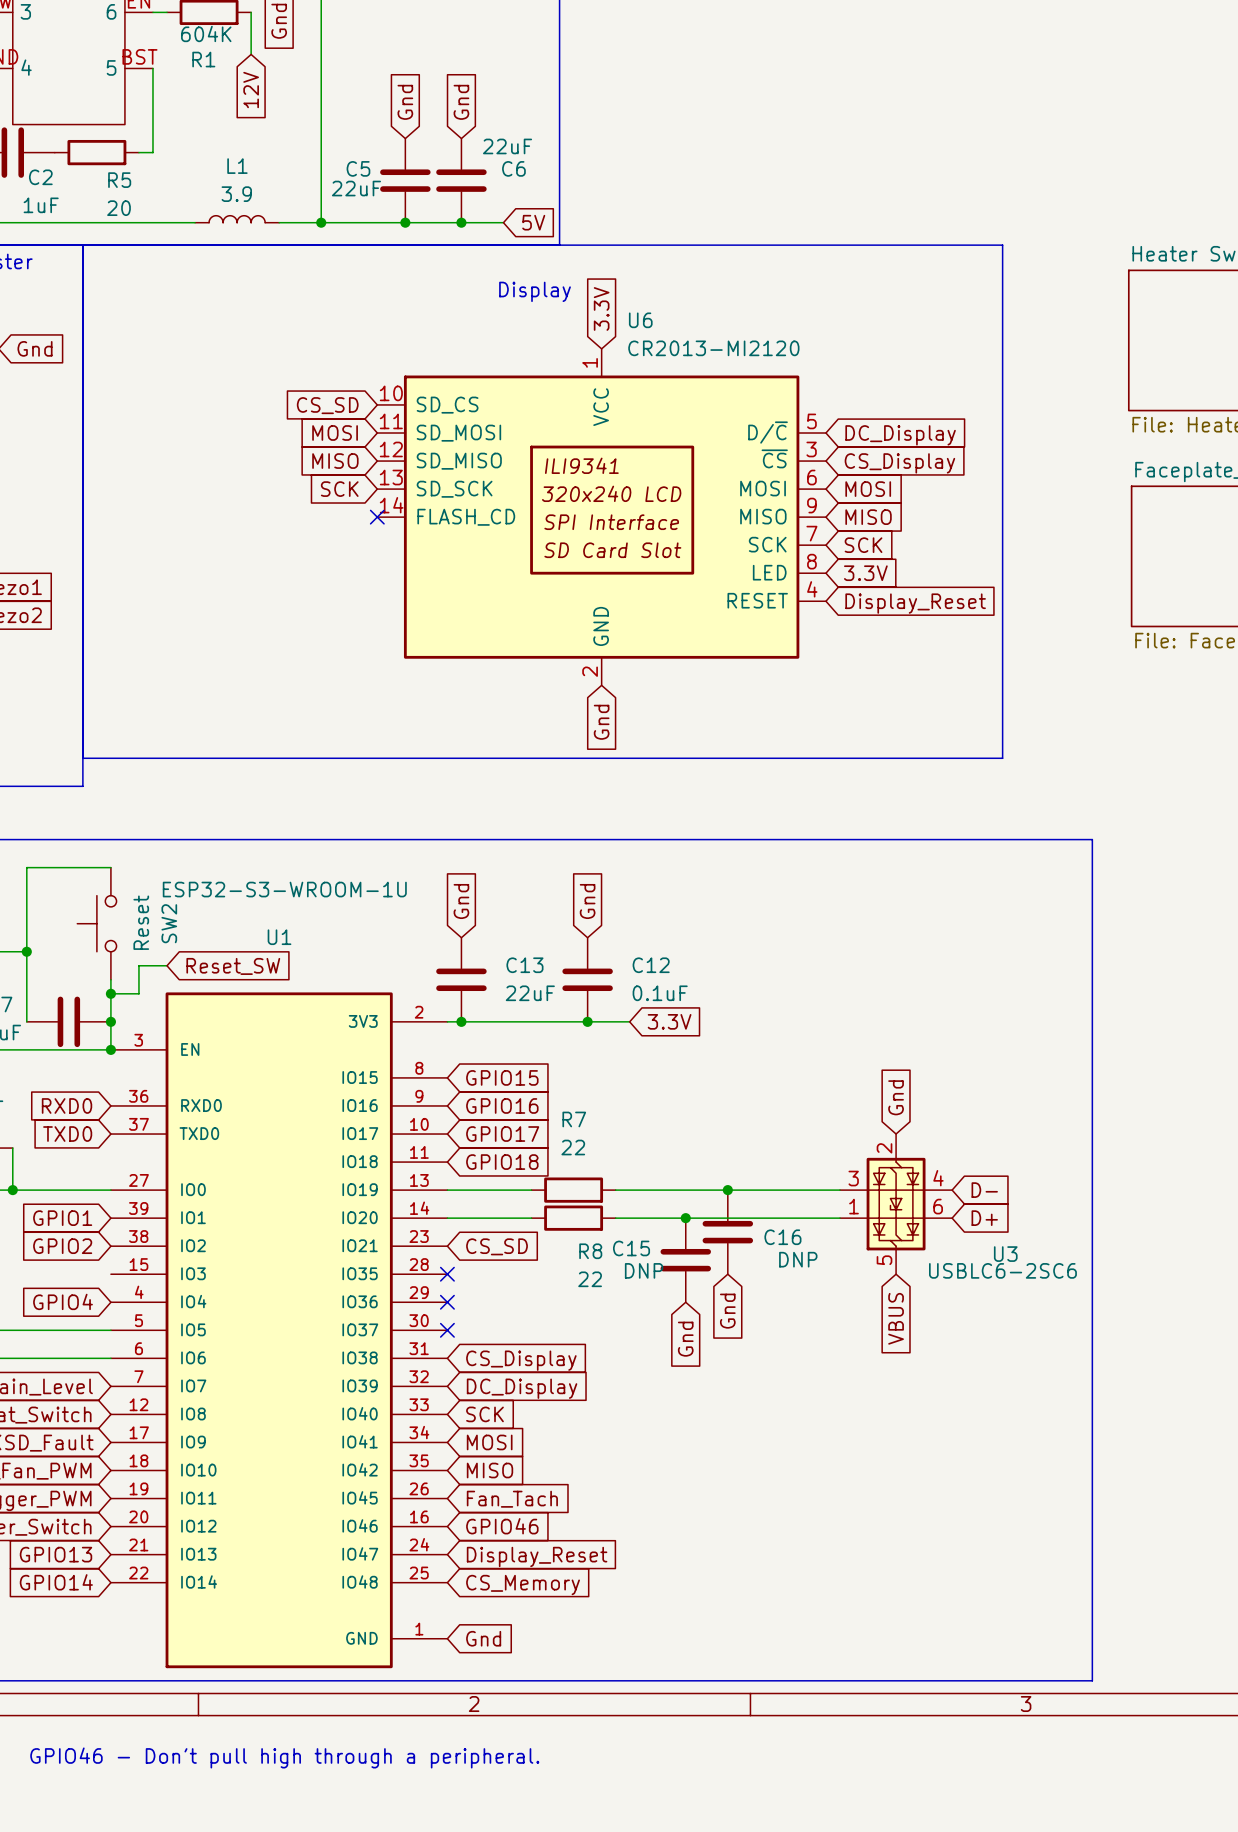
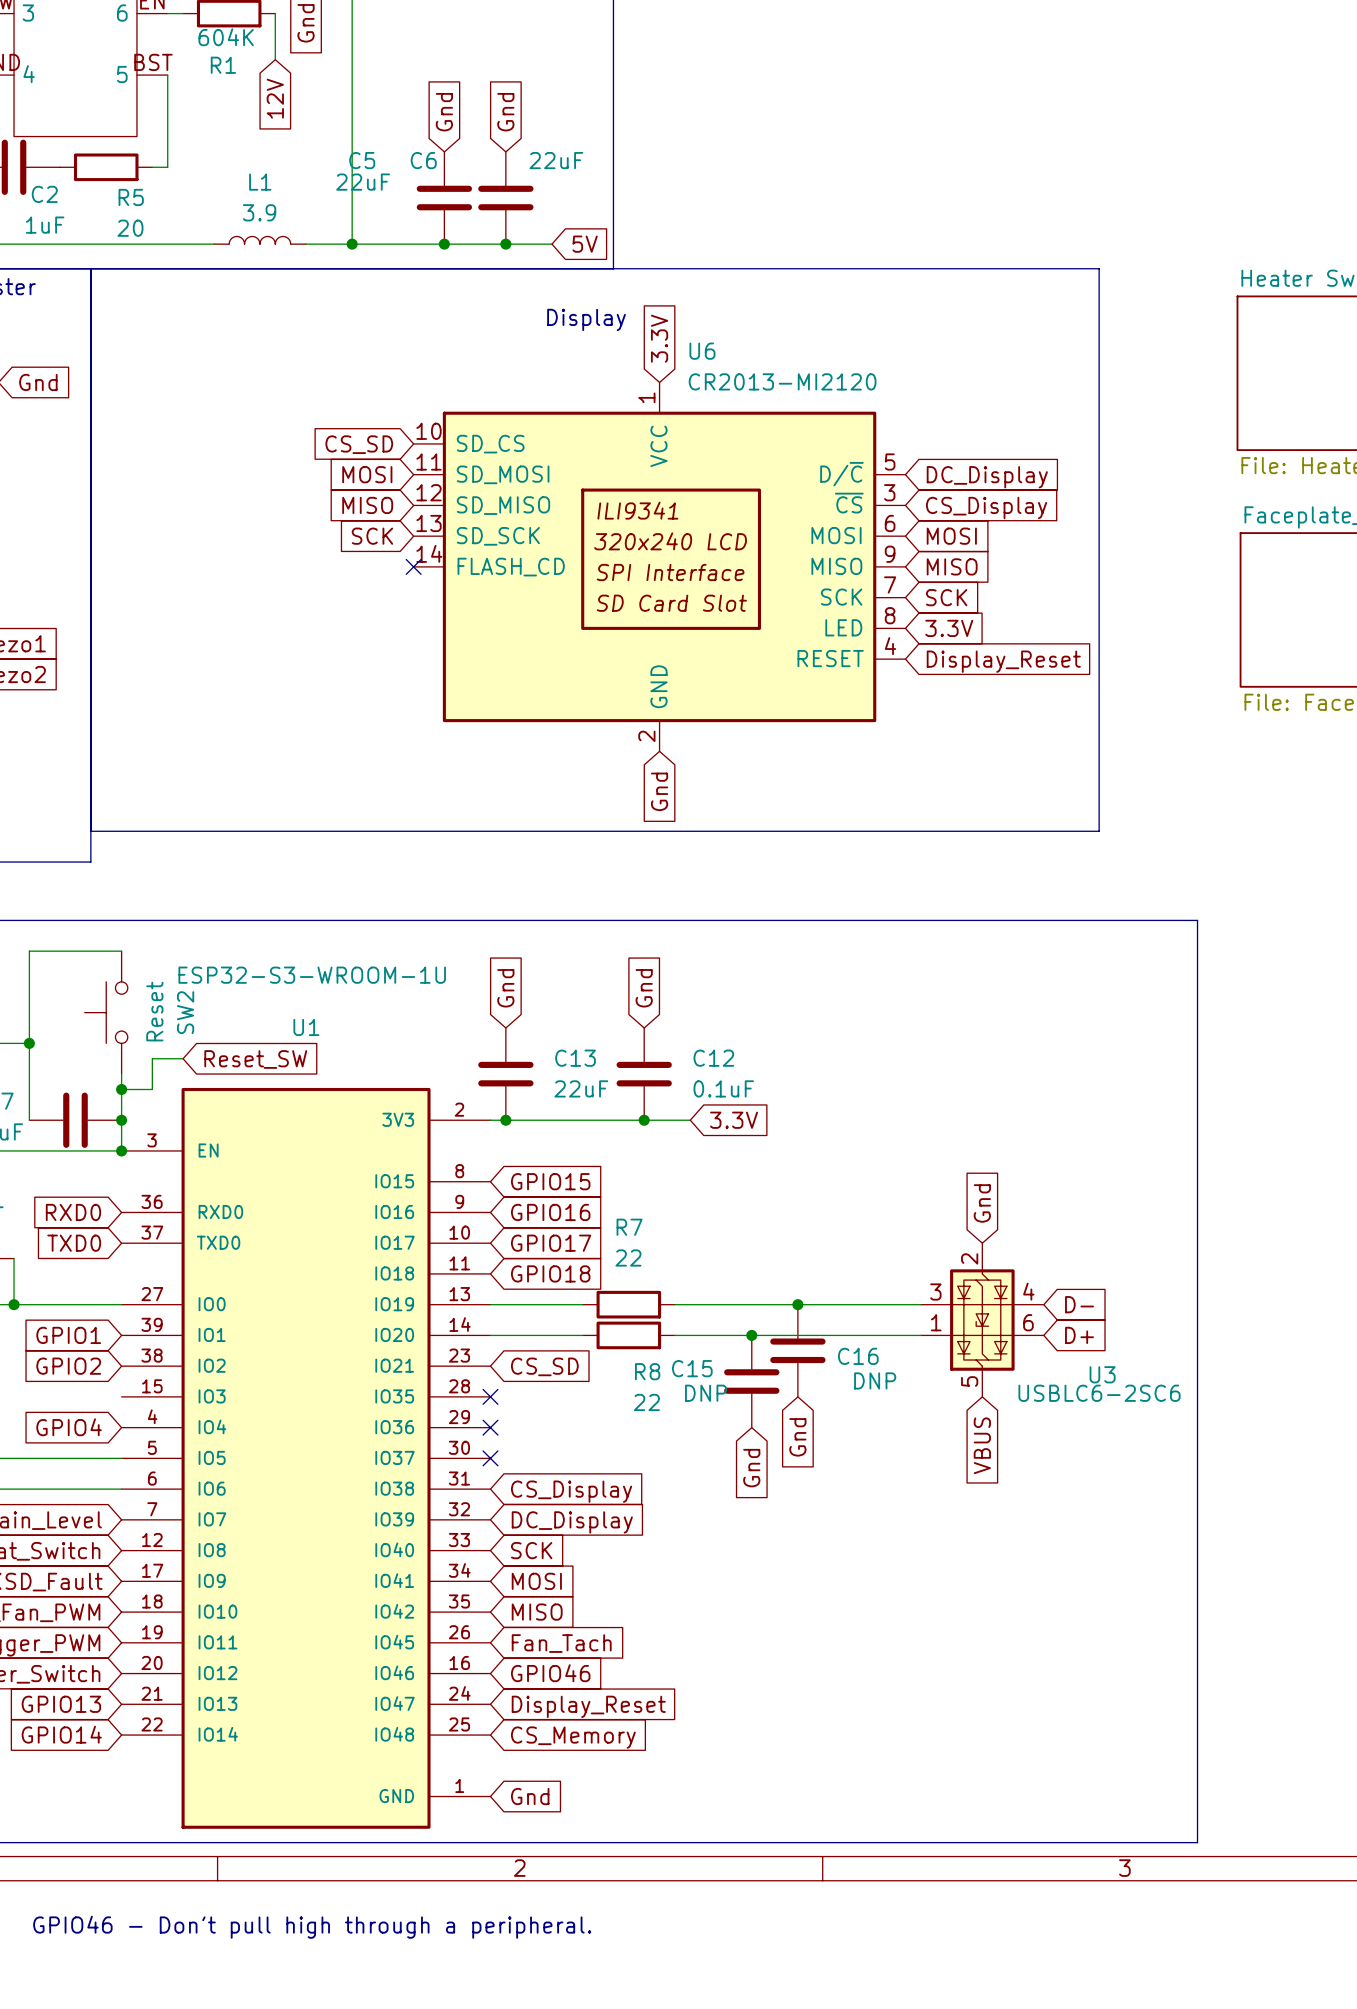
C5 name position: C5 (358, 168) -> C5 (362, 160)
C6 name position: C6 (513, 168) -> C6 (423, 160)
C5 value position: 22uF (356, 188) -> 22uF (363, 182)

